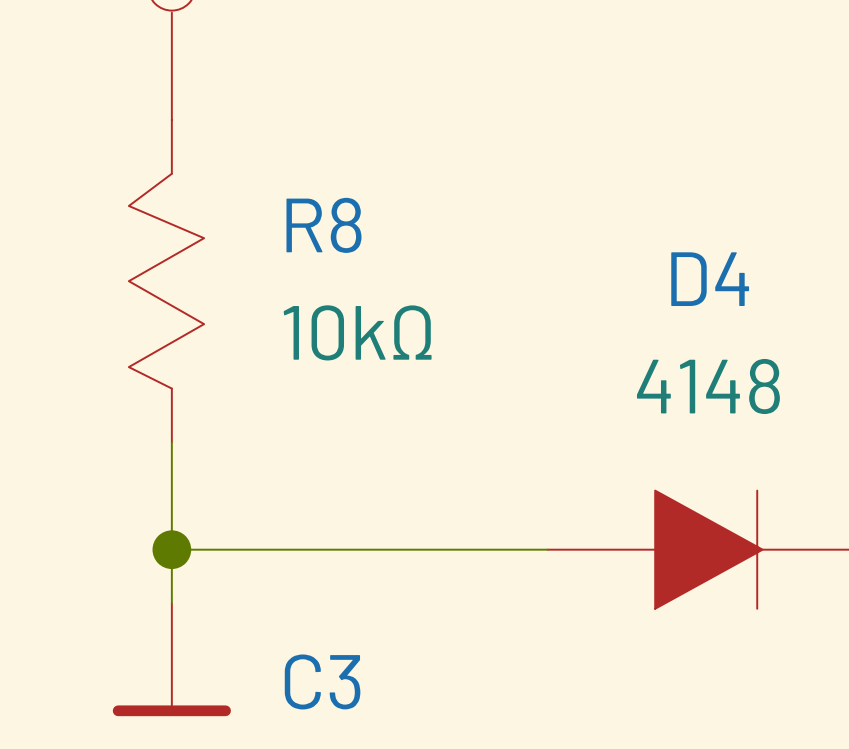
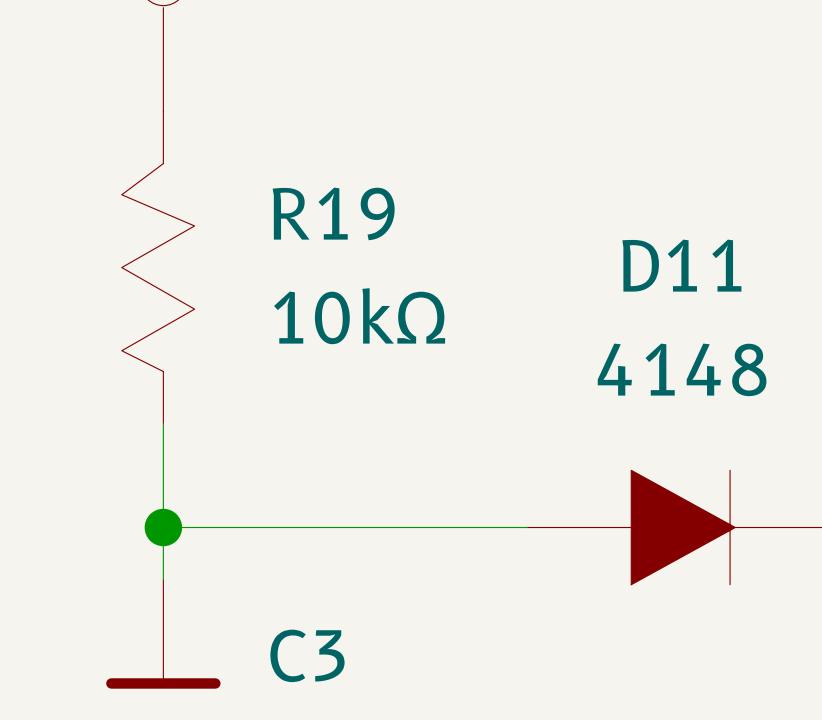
R8 name: R8 (323, 225) -> R19 (333, 213)
D4 name: D4 (710, 279) -> D11 (681, 265)

